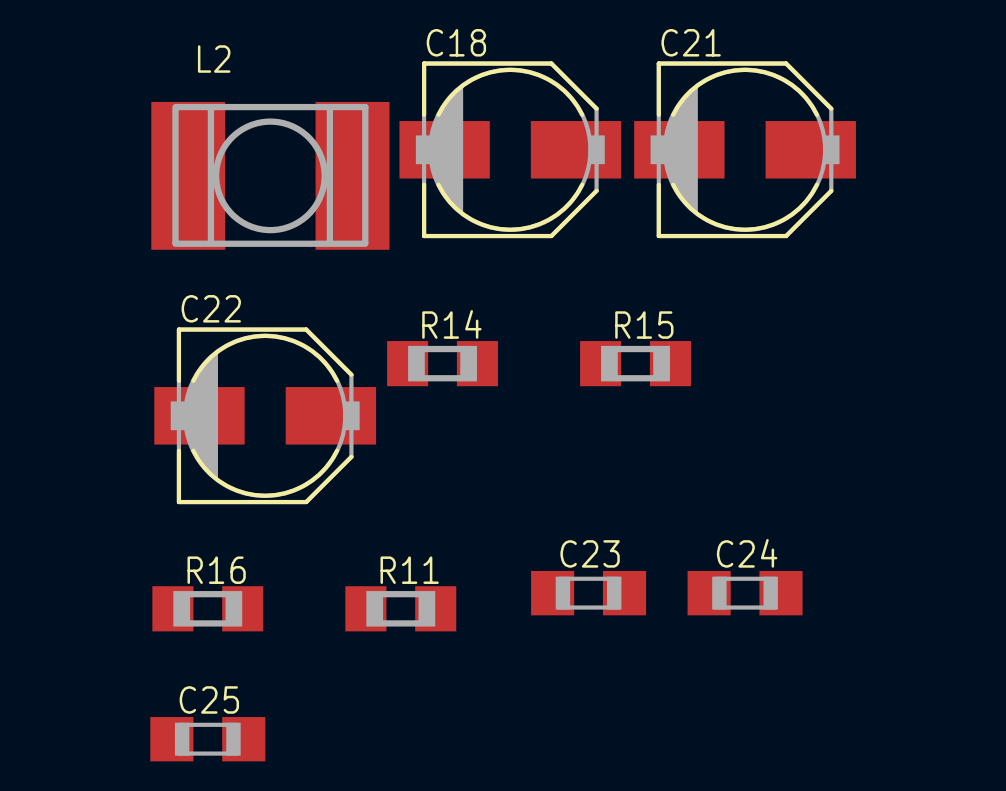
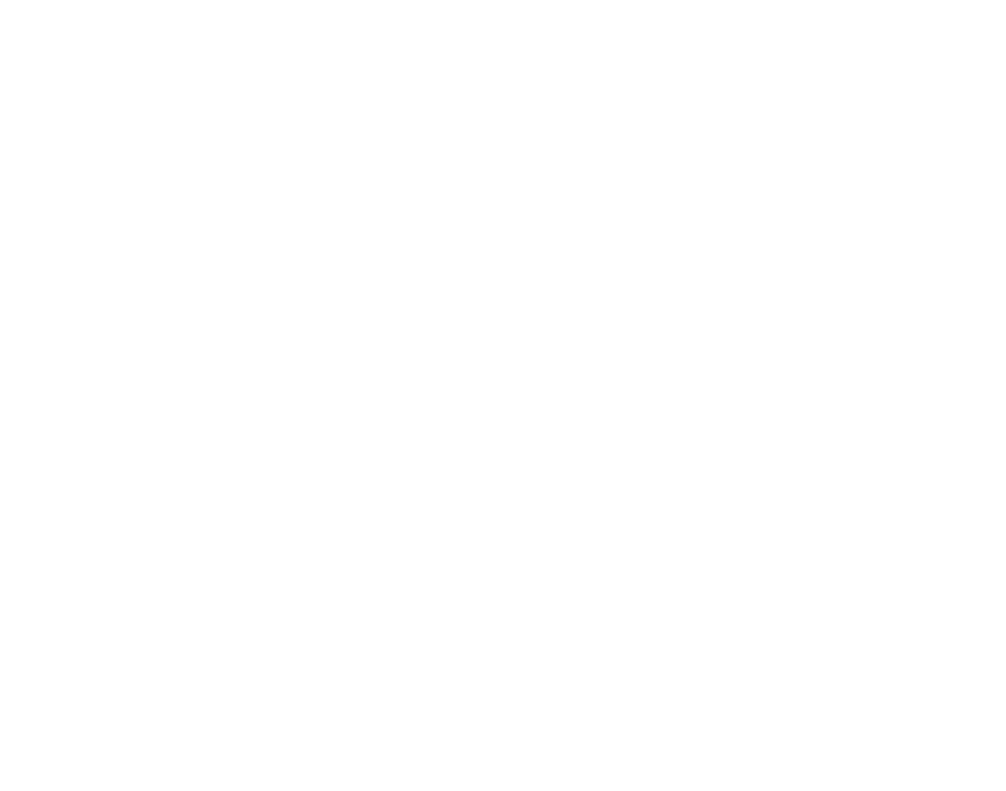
C18: (510, 149) -> none
C21: (745, 149) -> none
L2: (270, 175) -> none
R14: (442, 363) -> none
R15: (635, 363) -> none
C22: (265, 415) -> none
C23: (588, 593) -> none
C24: (745, 593) -> none
R16: (207, 608) -> none
R11: (400, 608) -> none
C25: (207, 739) -> none

